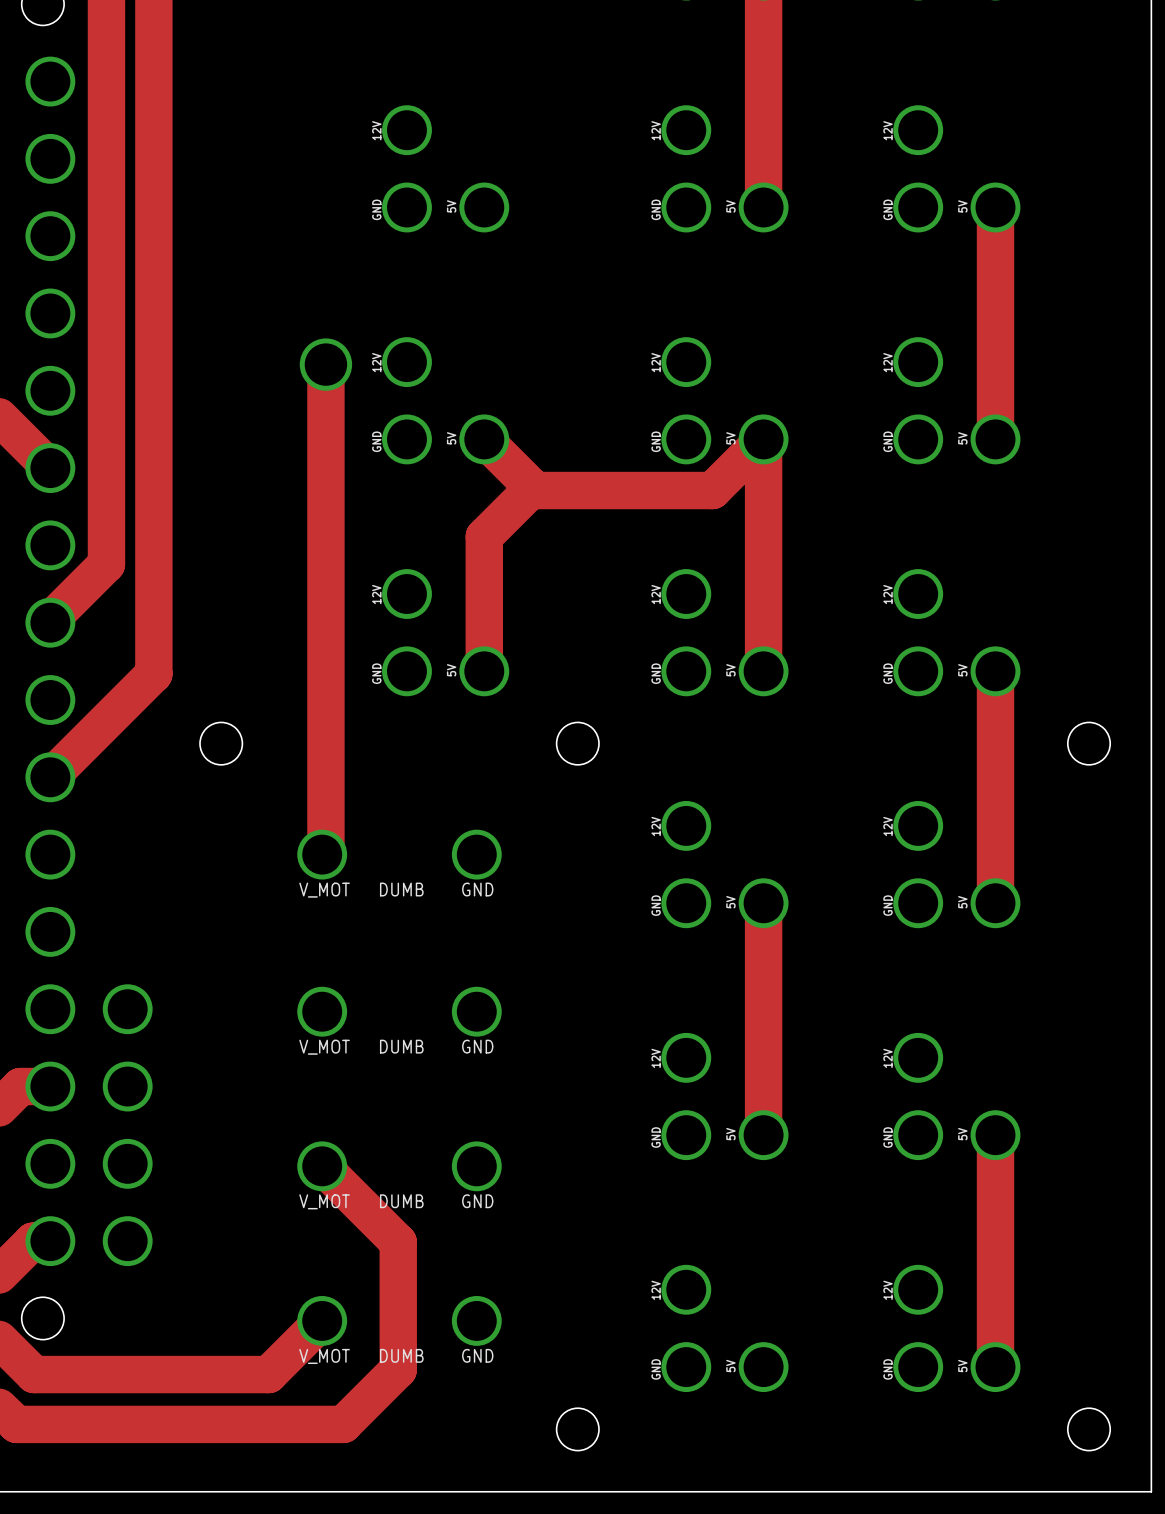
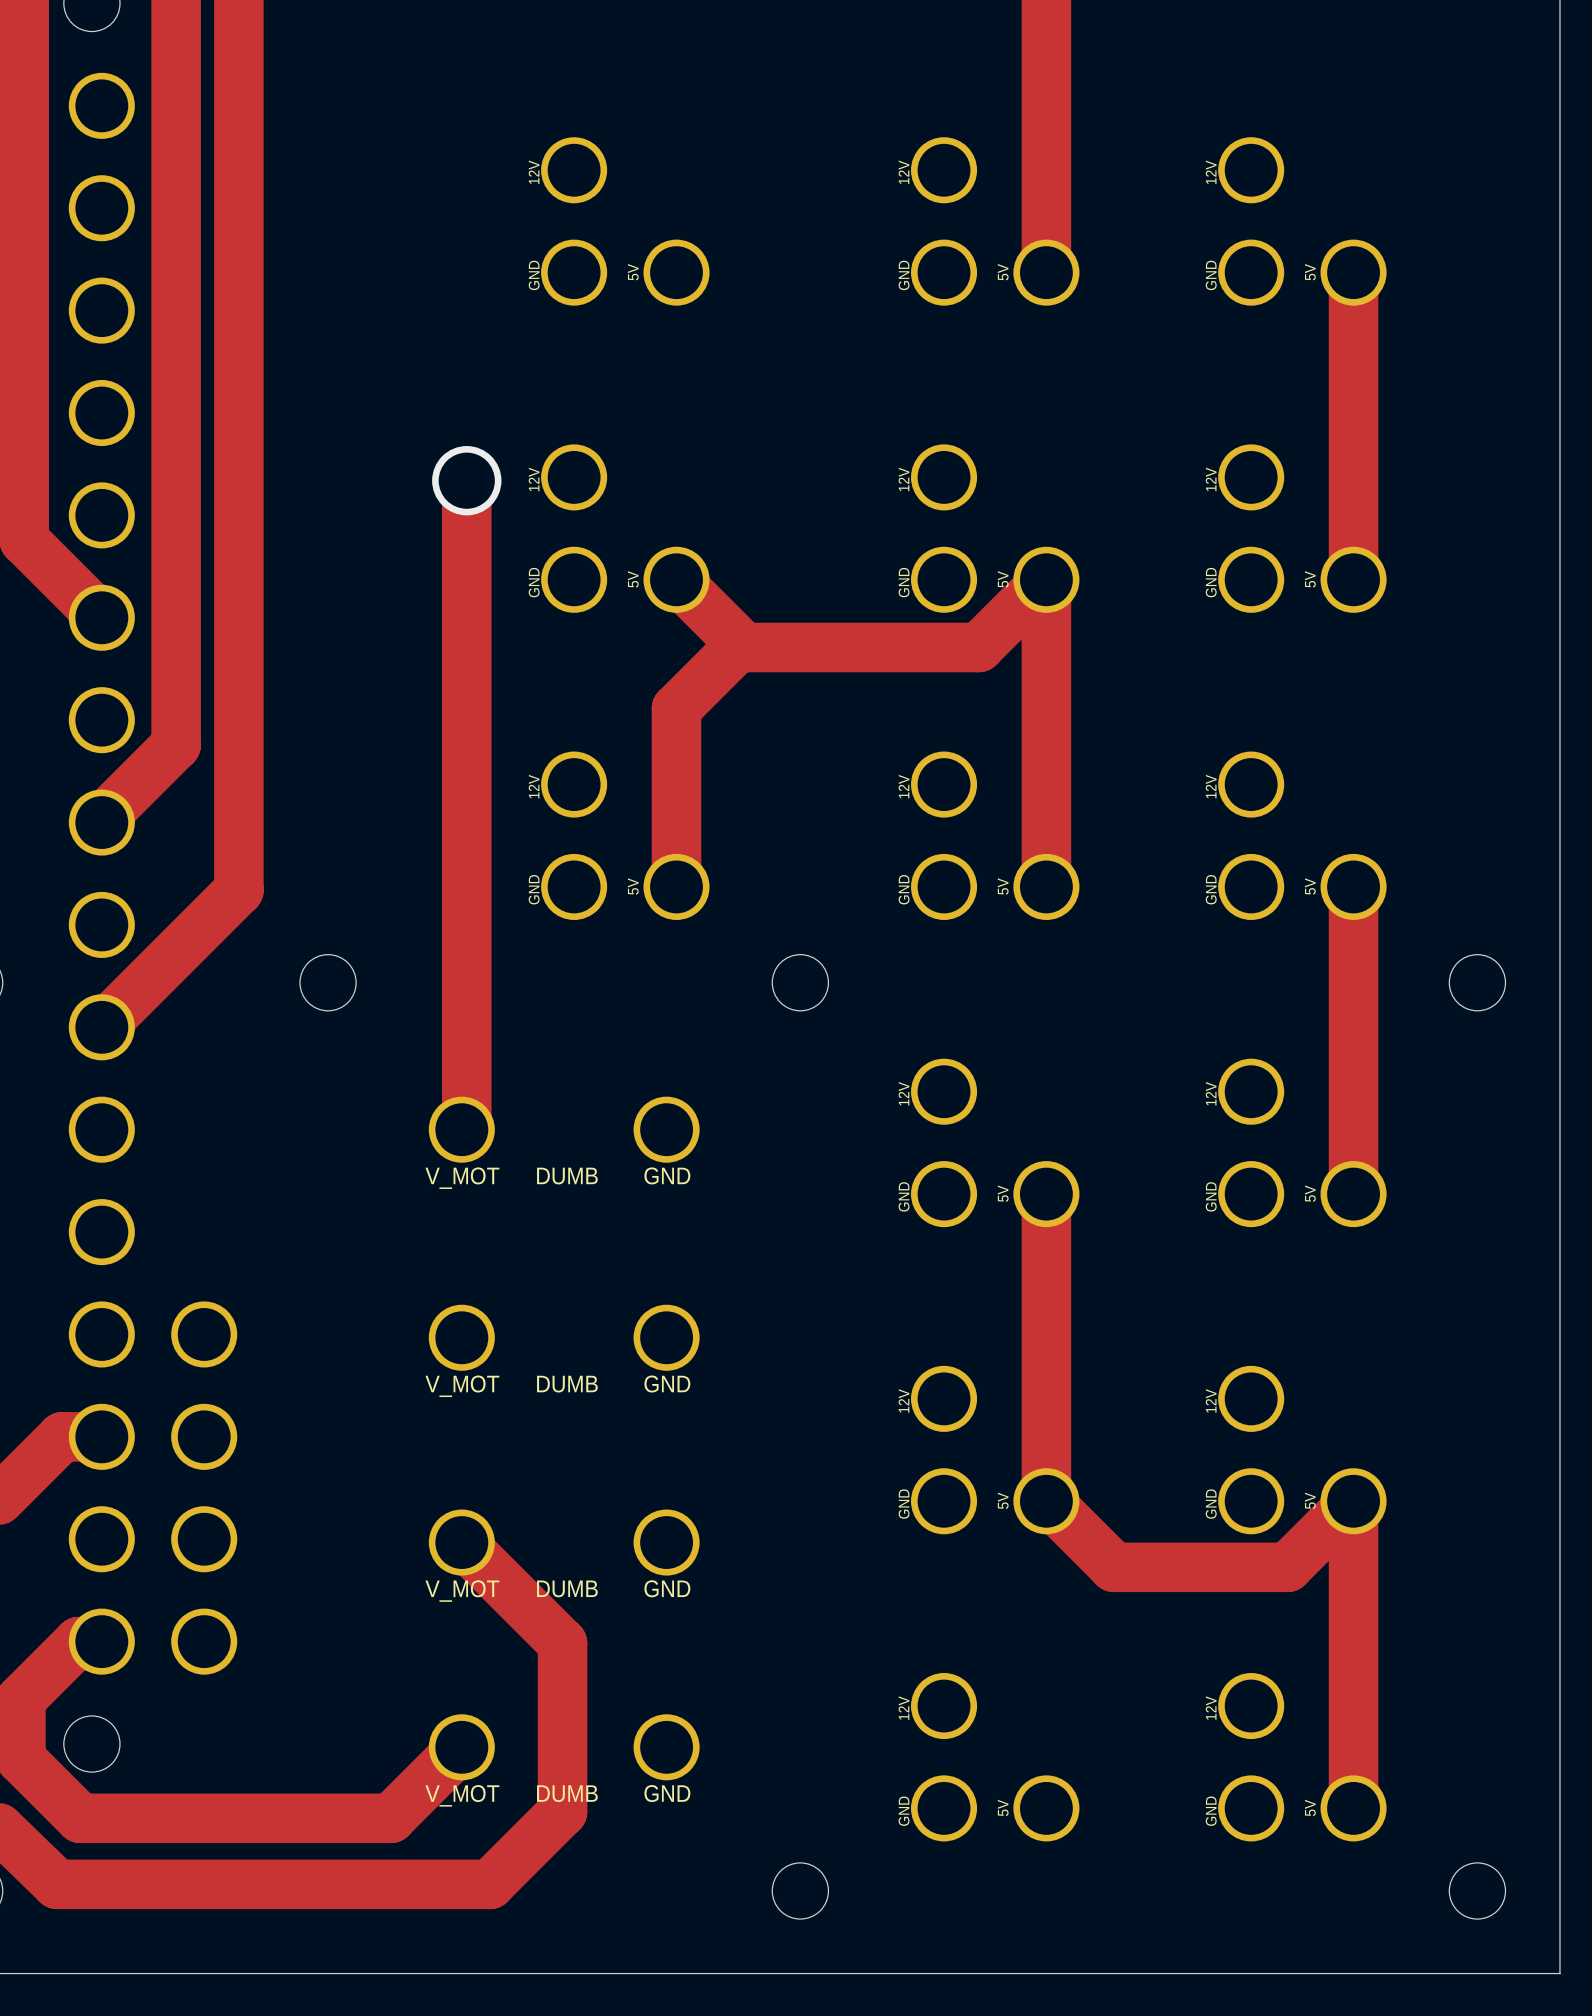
track: none -> (1048, 1501) (1114, 1567) (1287, 1567) (1353, 1501)

